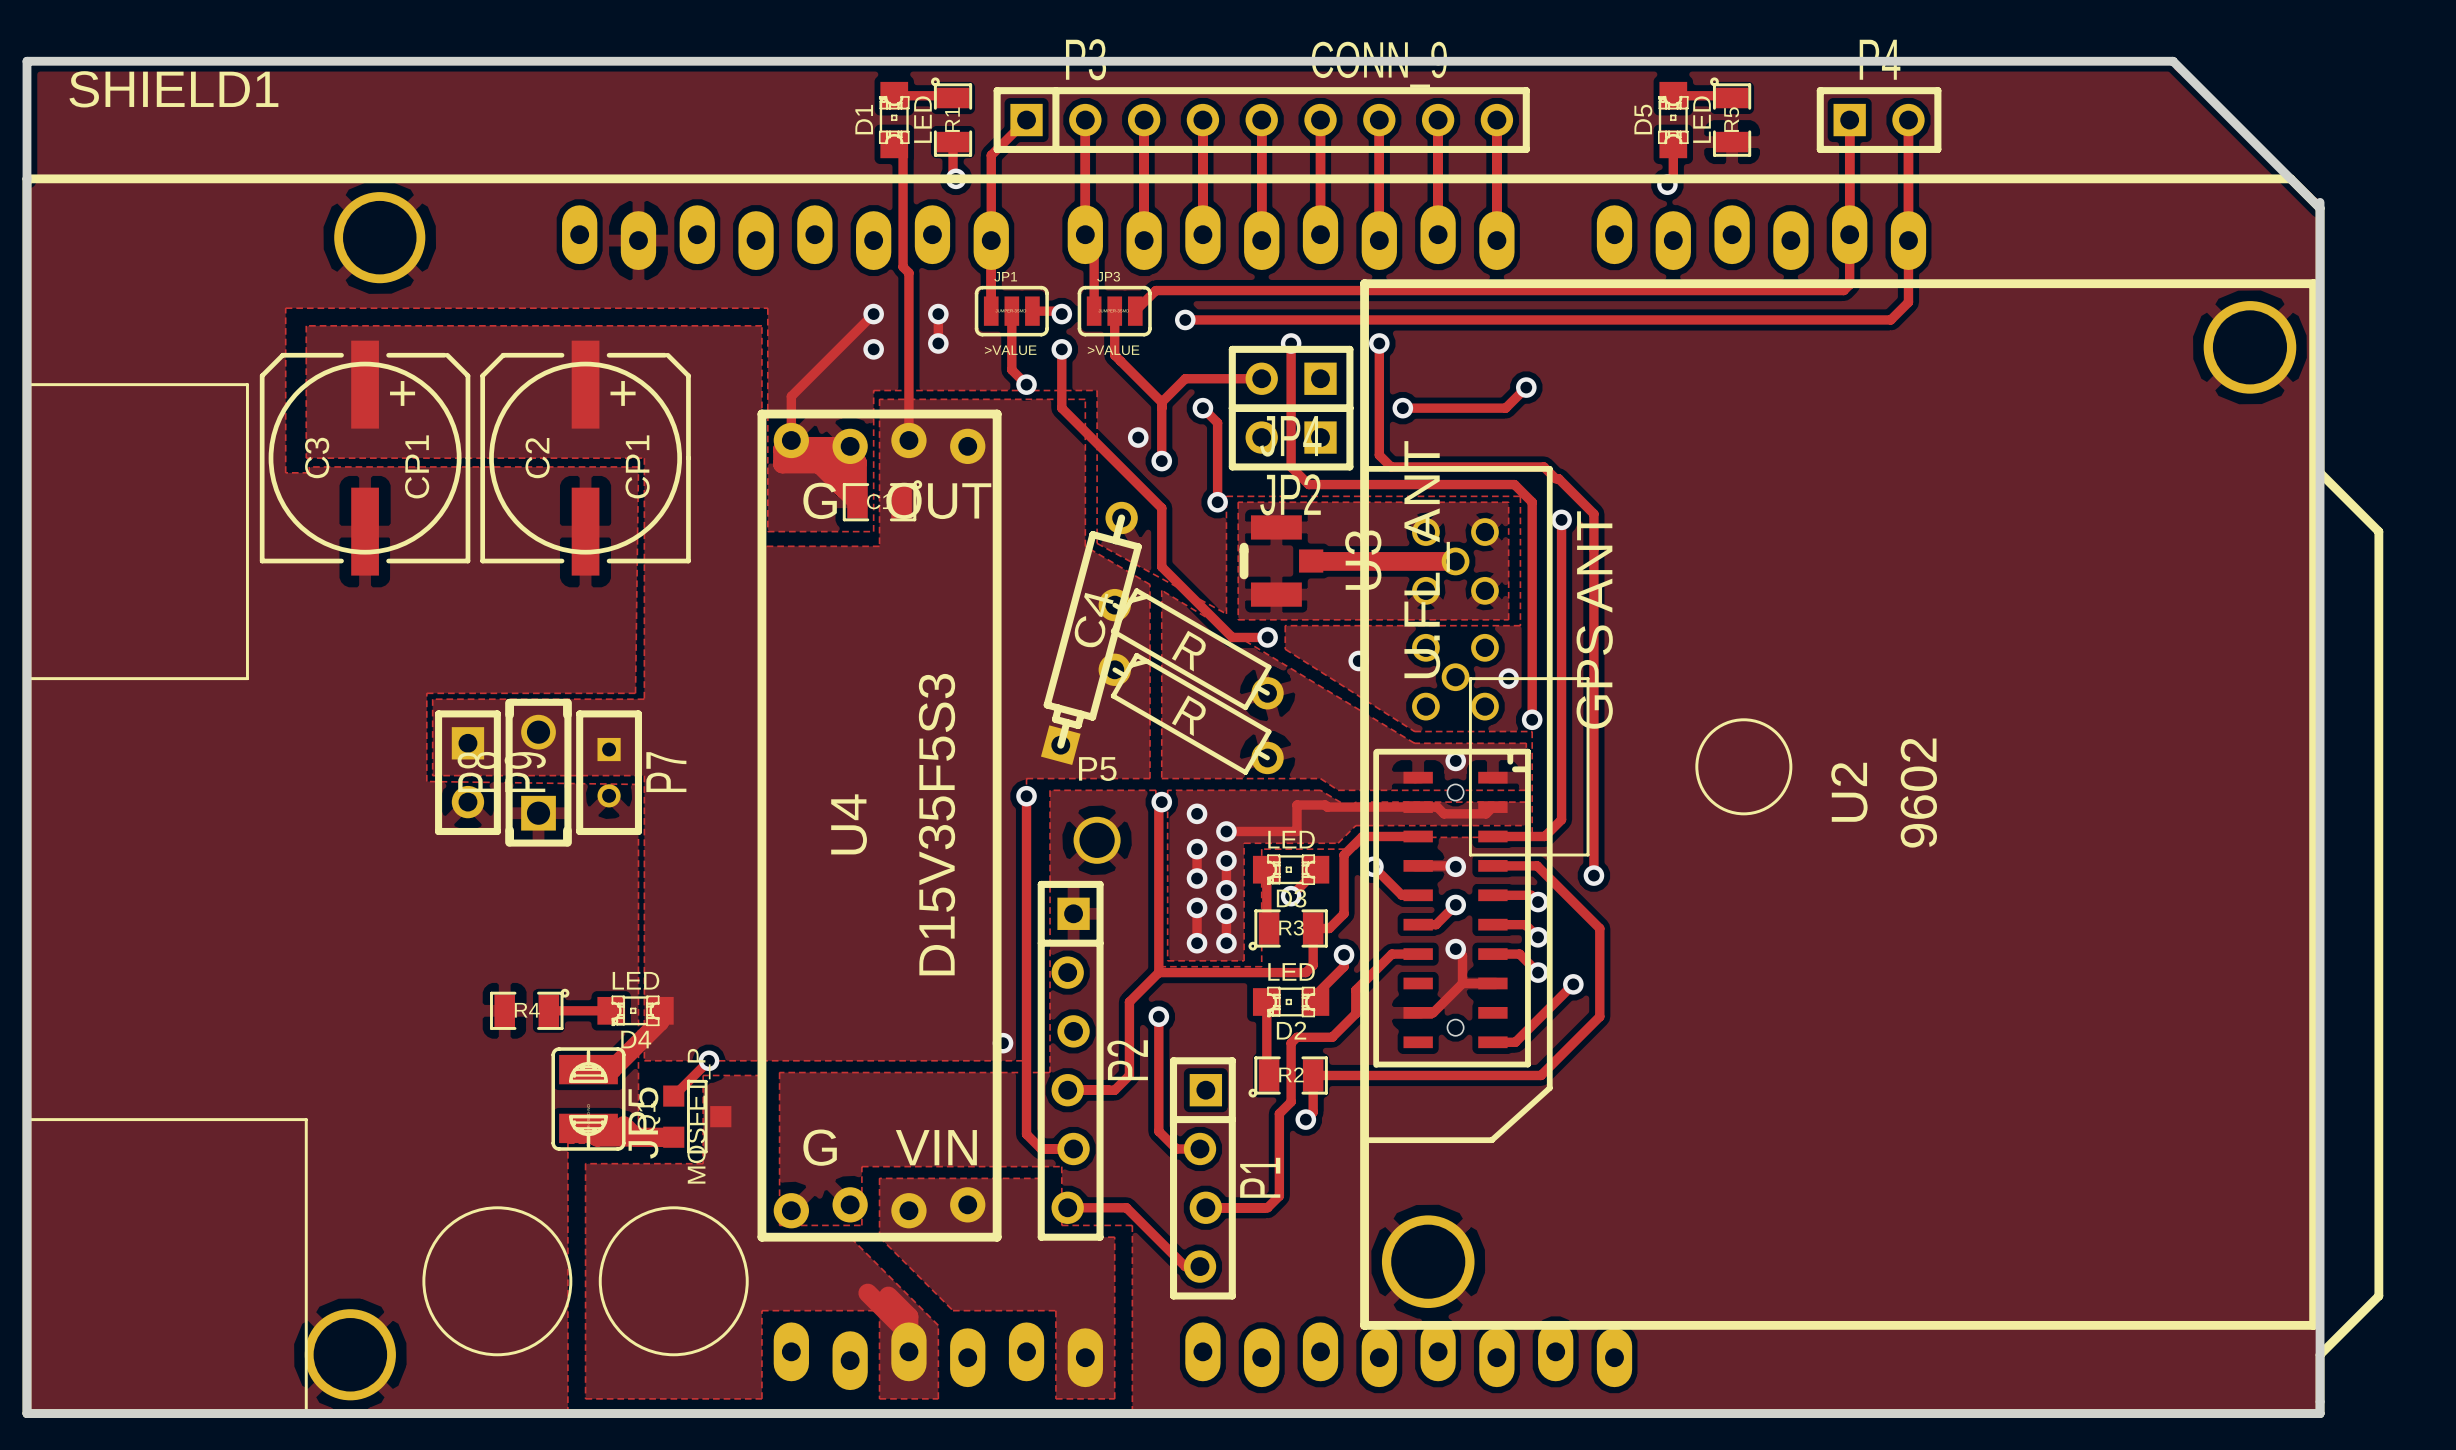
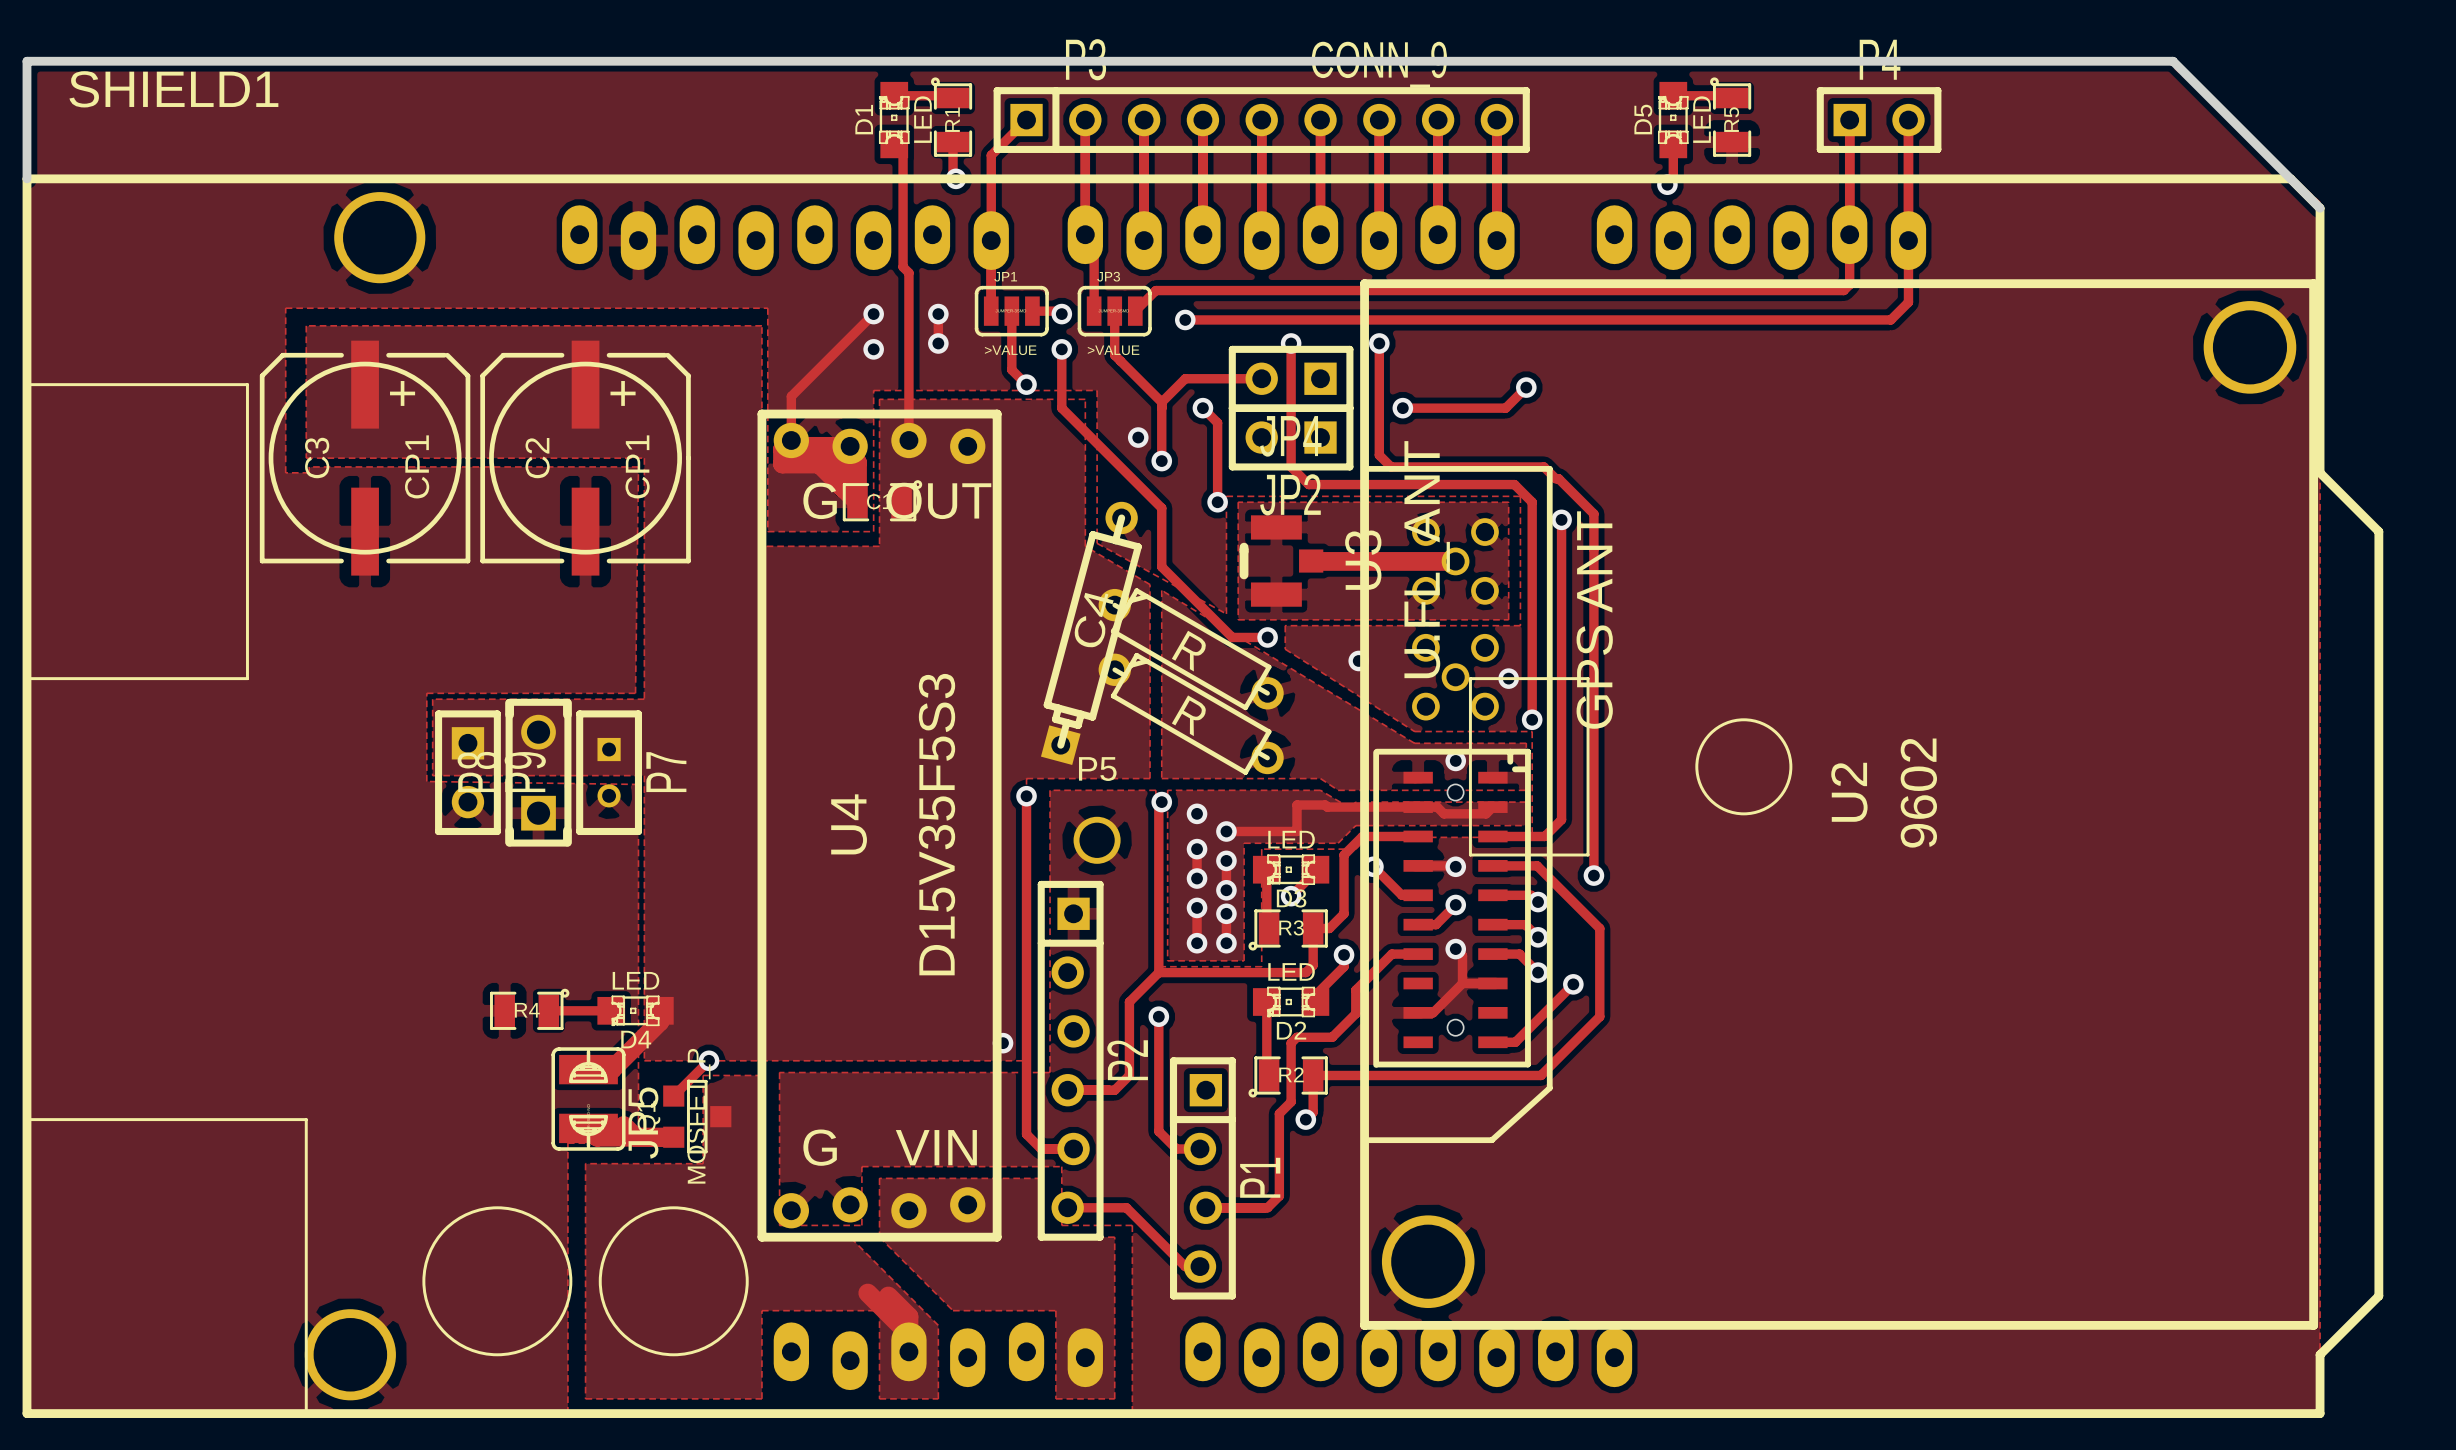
board edge: (26, 178) (26, 1413) (2320, 1413) (2320, 202) -> none

